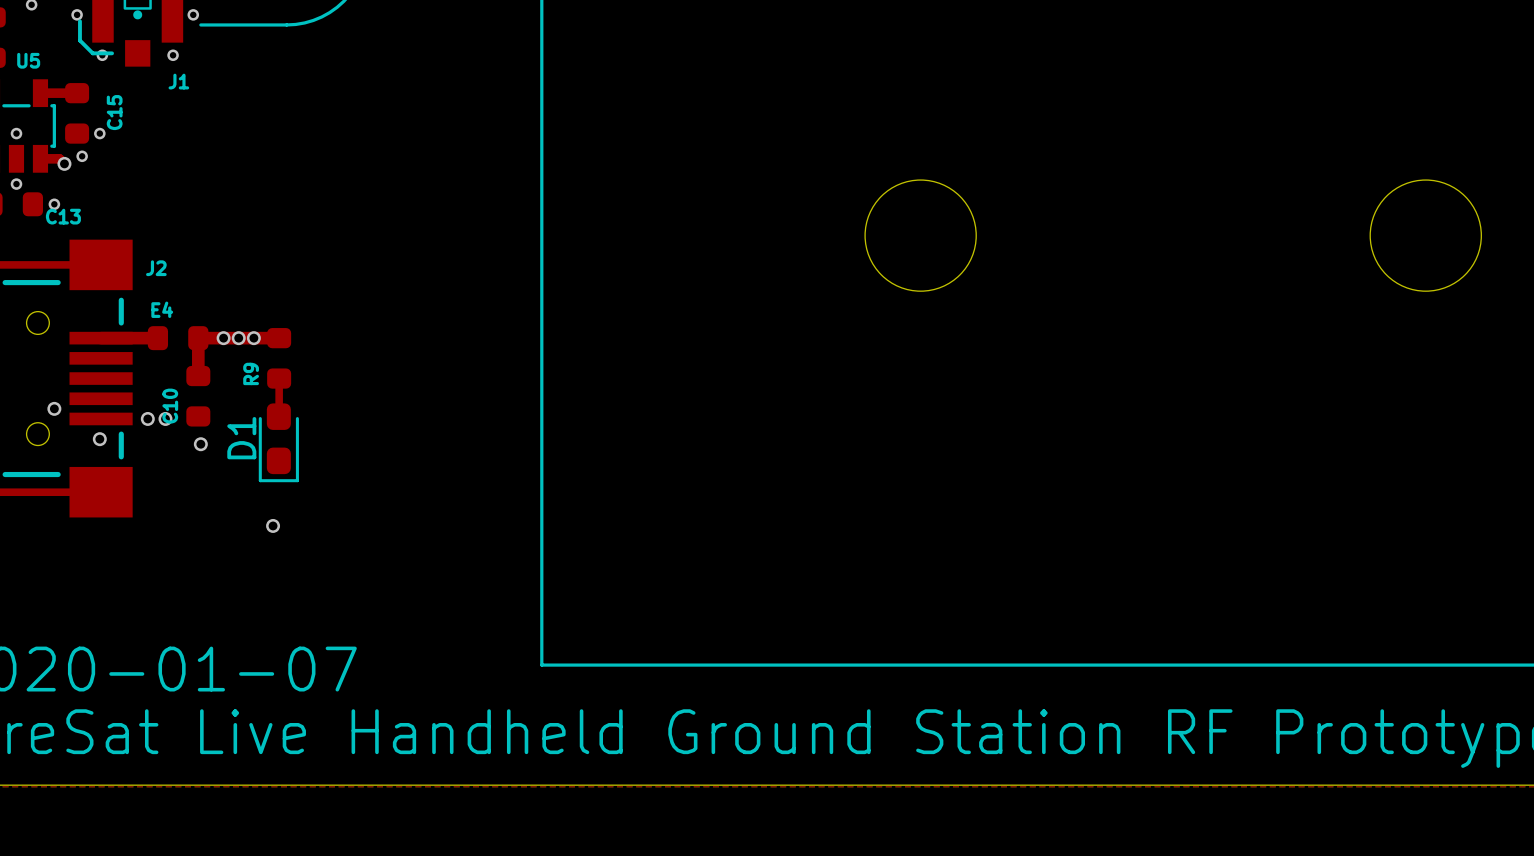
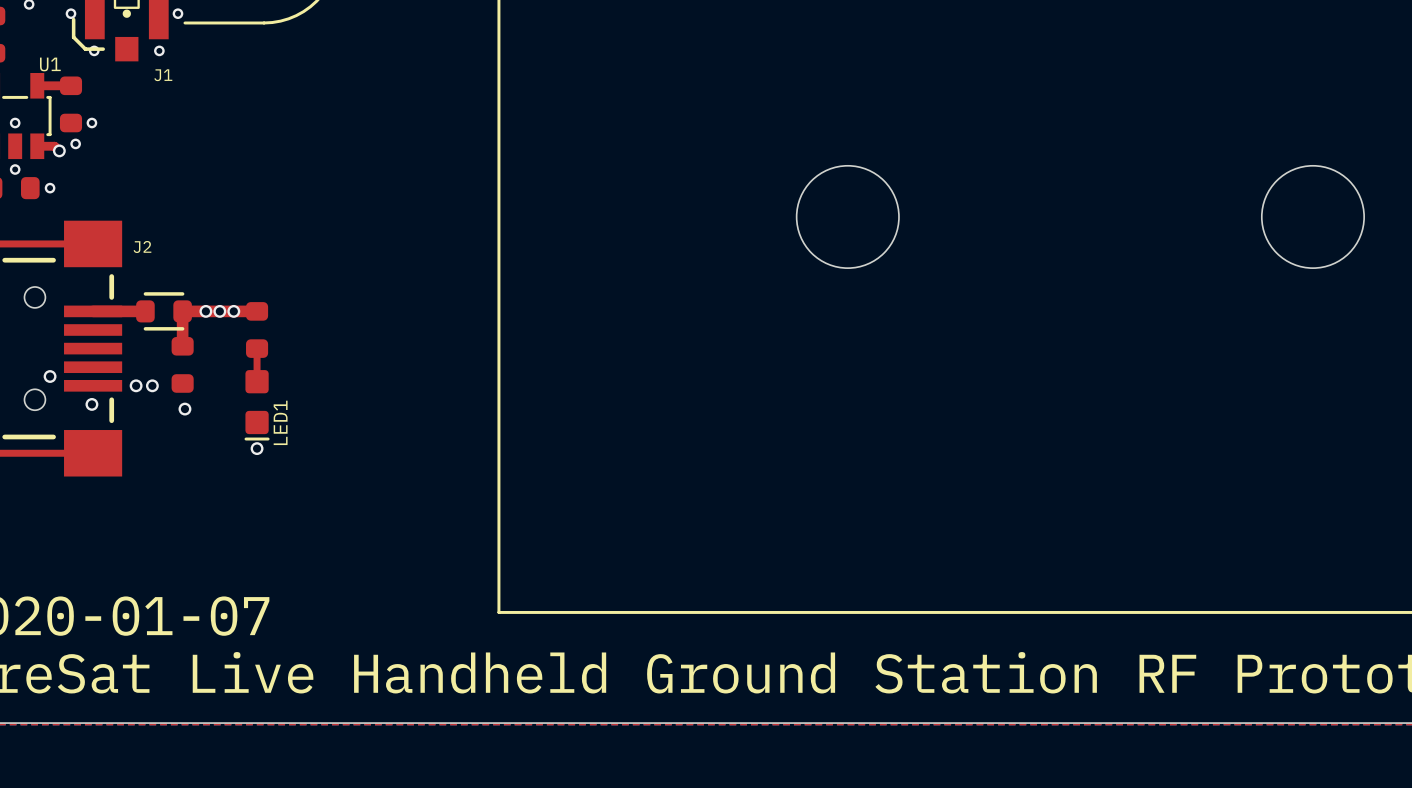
U5 name: U5 (28, 60) -> U1 (50, 64)
C15 name: C15 (114, 112) -> none
C13 name: C13 (63, 216) -> none
E4: (178, 338) -> none
part: none -> (164, 311)
R9 name: R9 (251, 373) -> none
C10 name: C10 (170, 406) -> none
LED1: none -> (257, 405)
D1: (278, 442) -> none
via position: (273, 525) -> (257, 448)

